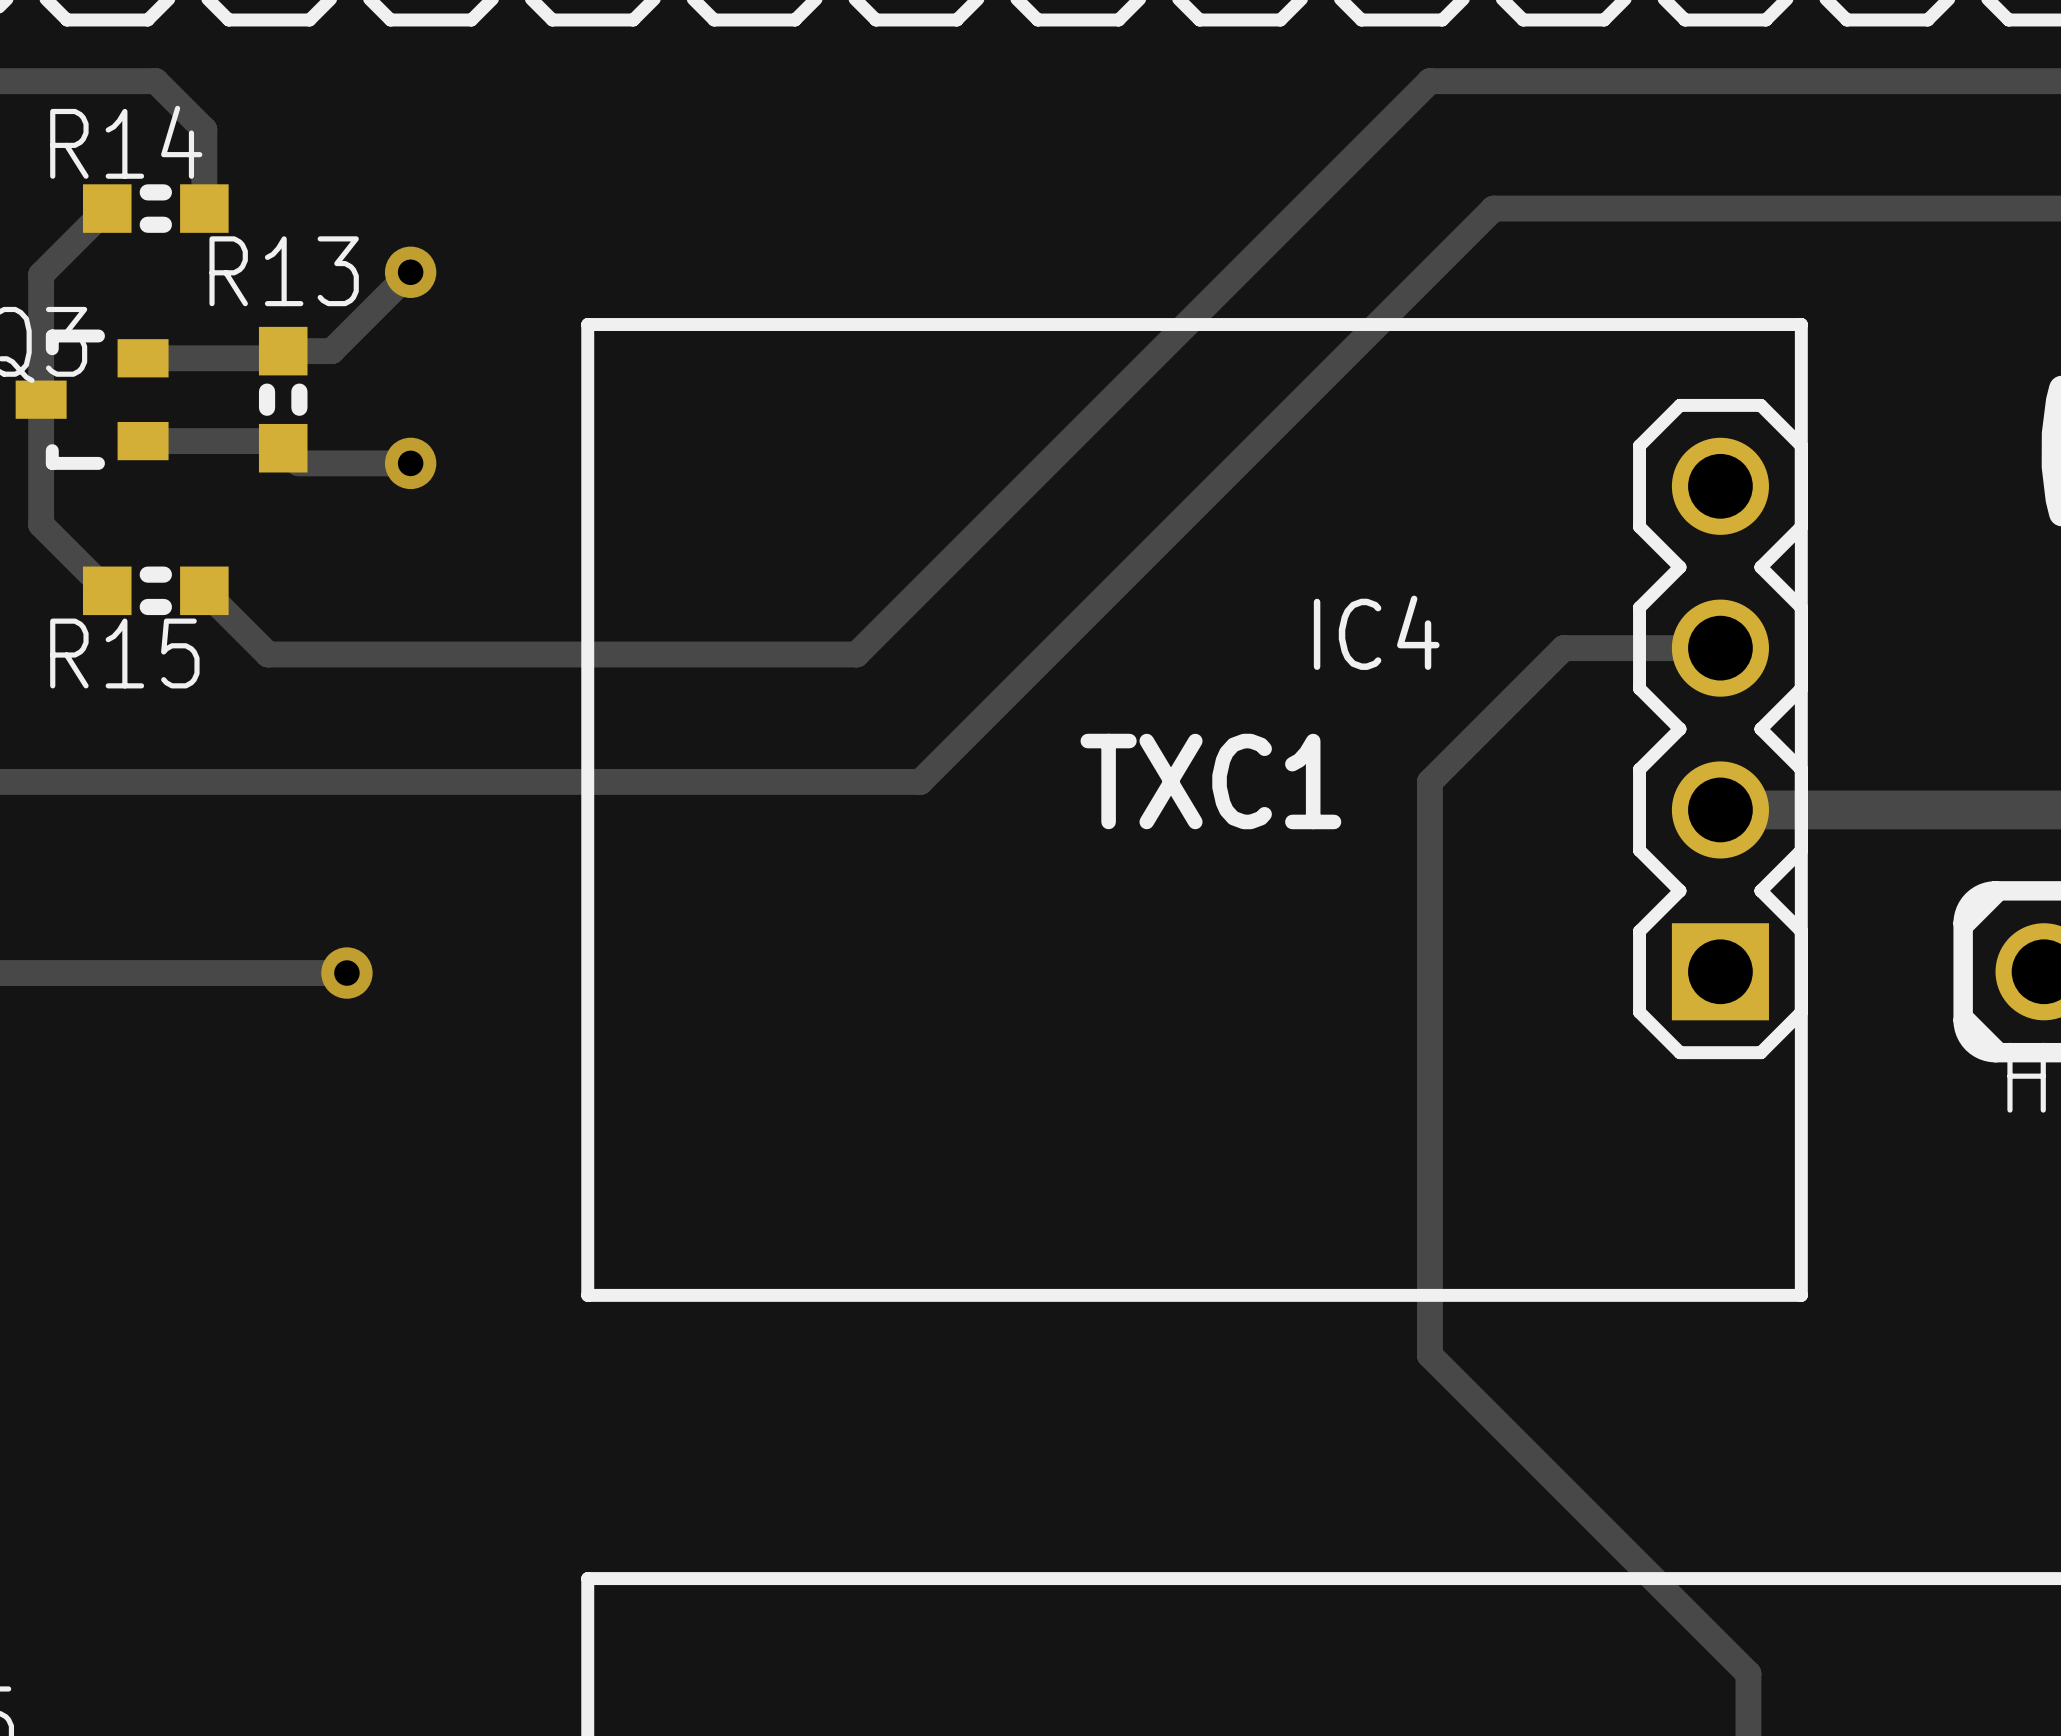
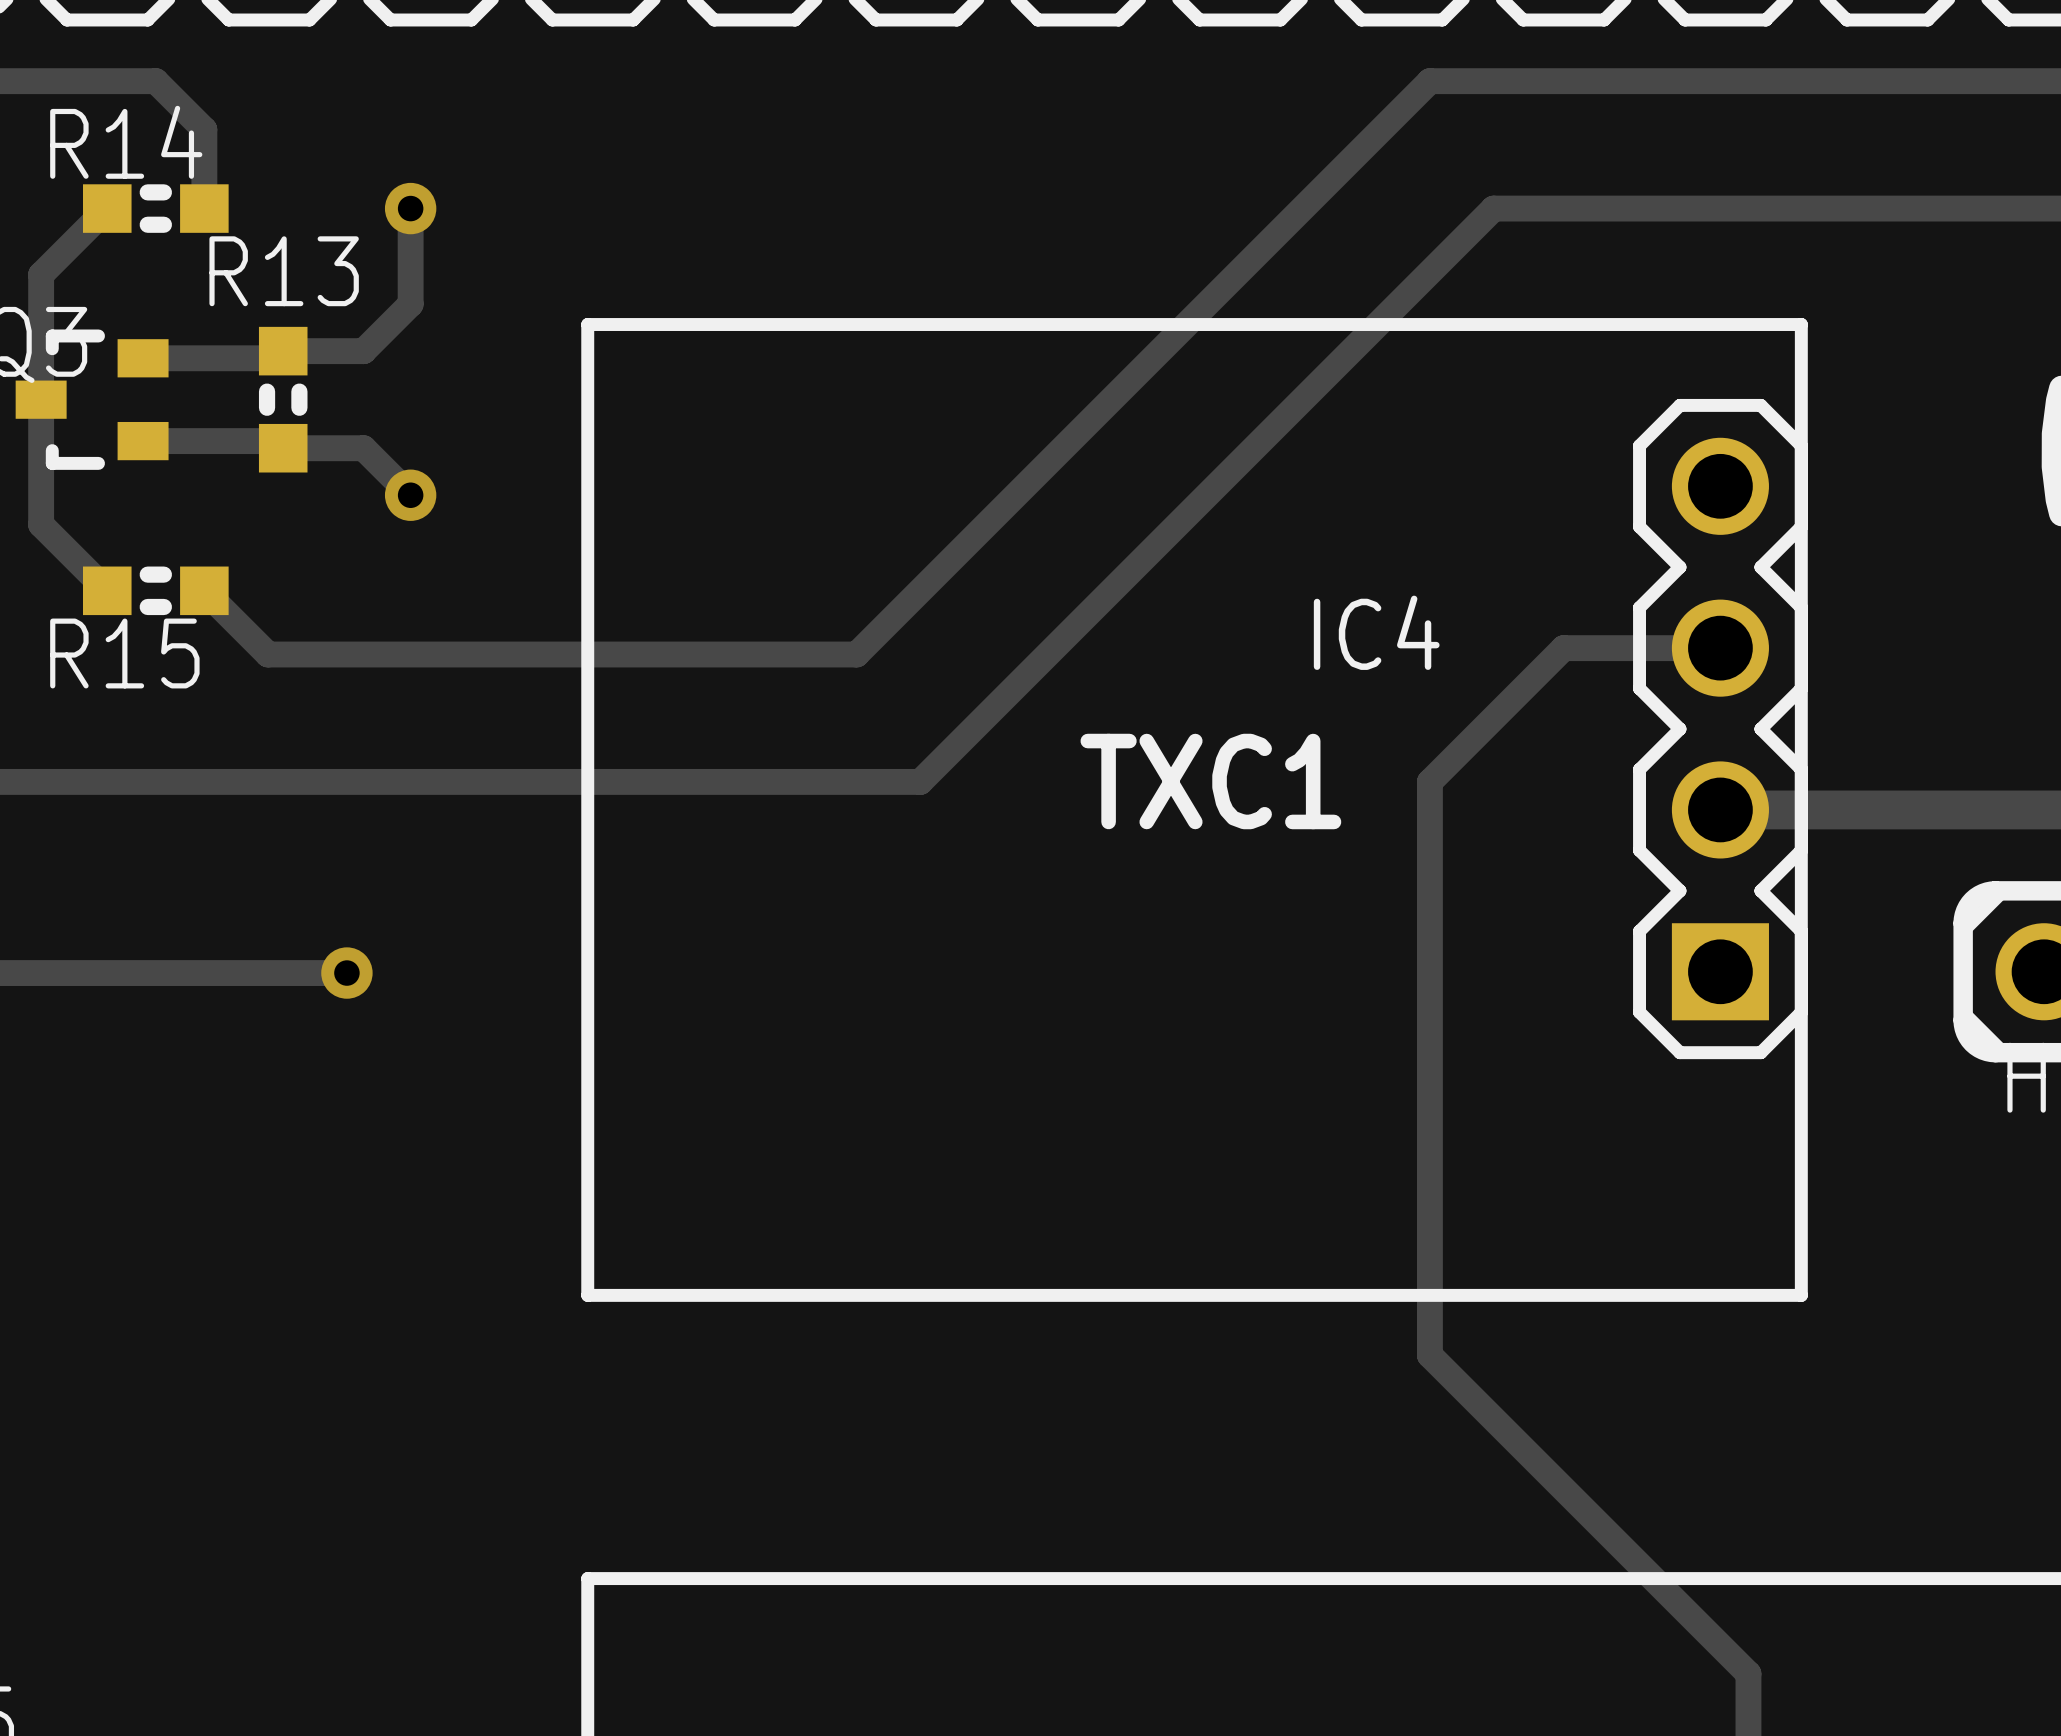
track: (410, 272) (331, 351) -> (410, 208) (410, 304) (363, 351) (331, 351)
via position: (410, 272) -> (410, 208)
track: (283, 448) (298, 463) (410, 463) -> (283, 448) (363, 448) (410, 495)
via position: (410, 463) -> (410, 495)

